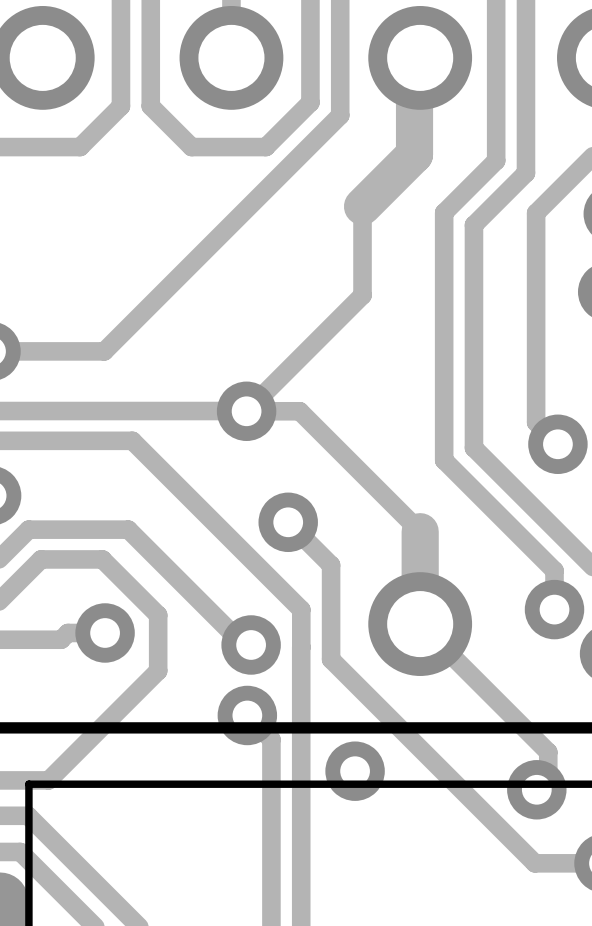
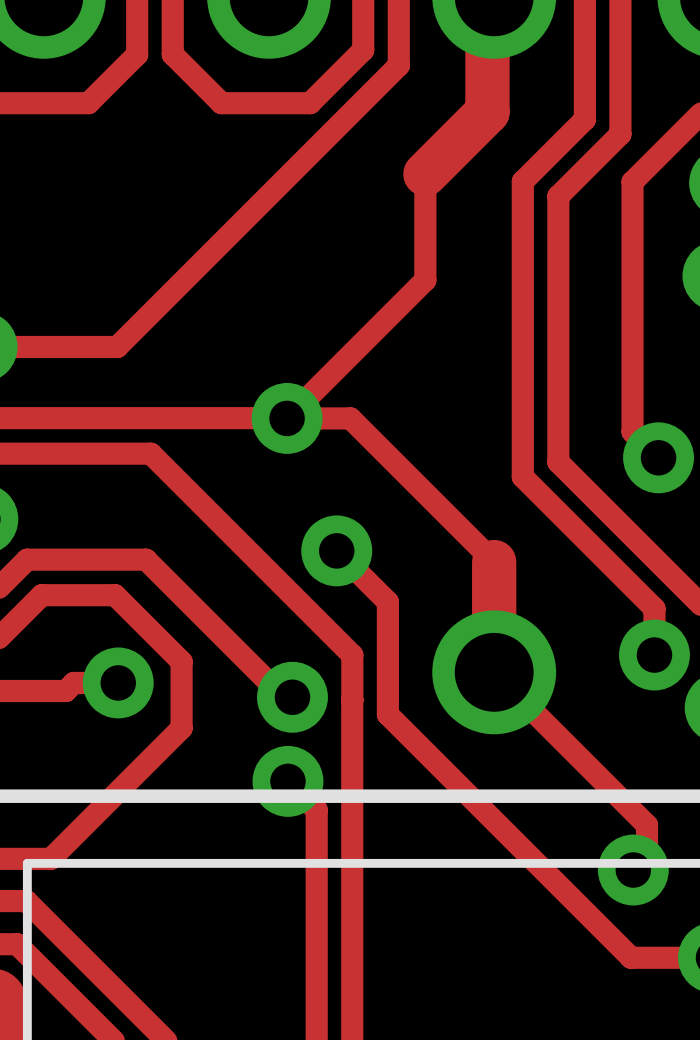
via: (355, 771) -> none

